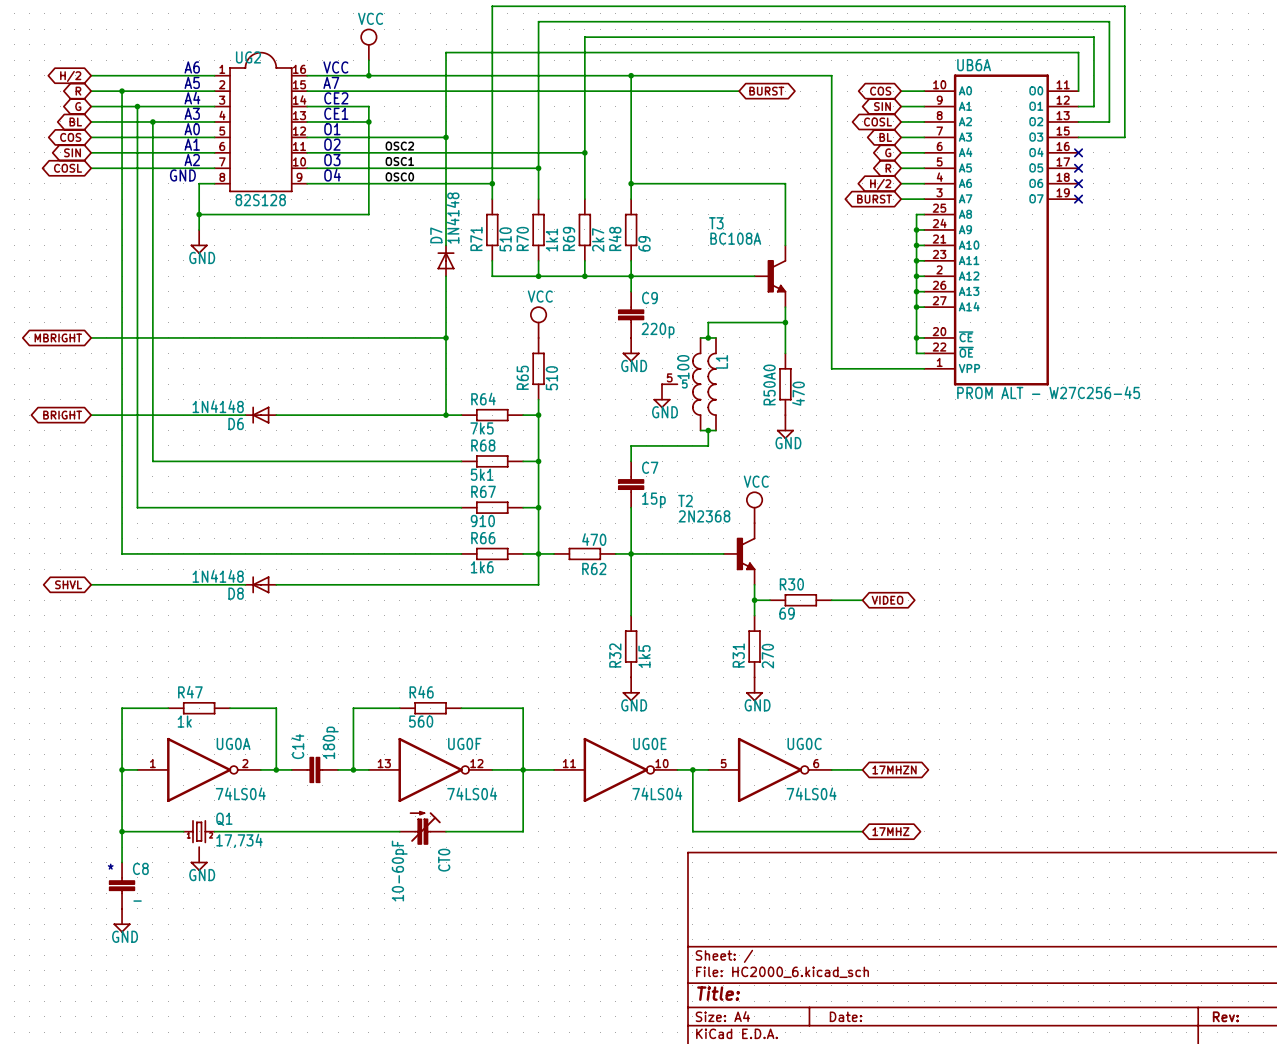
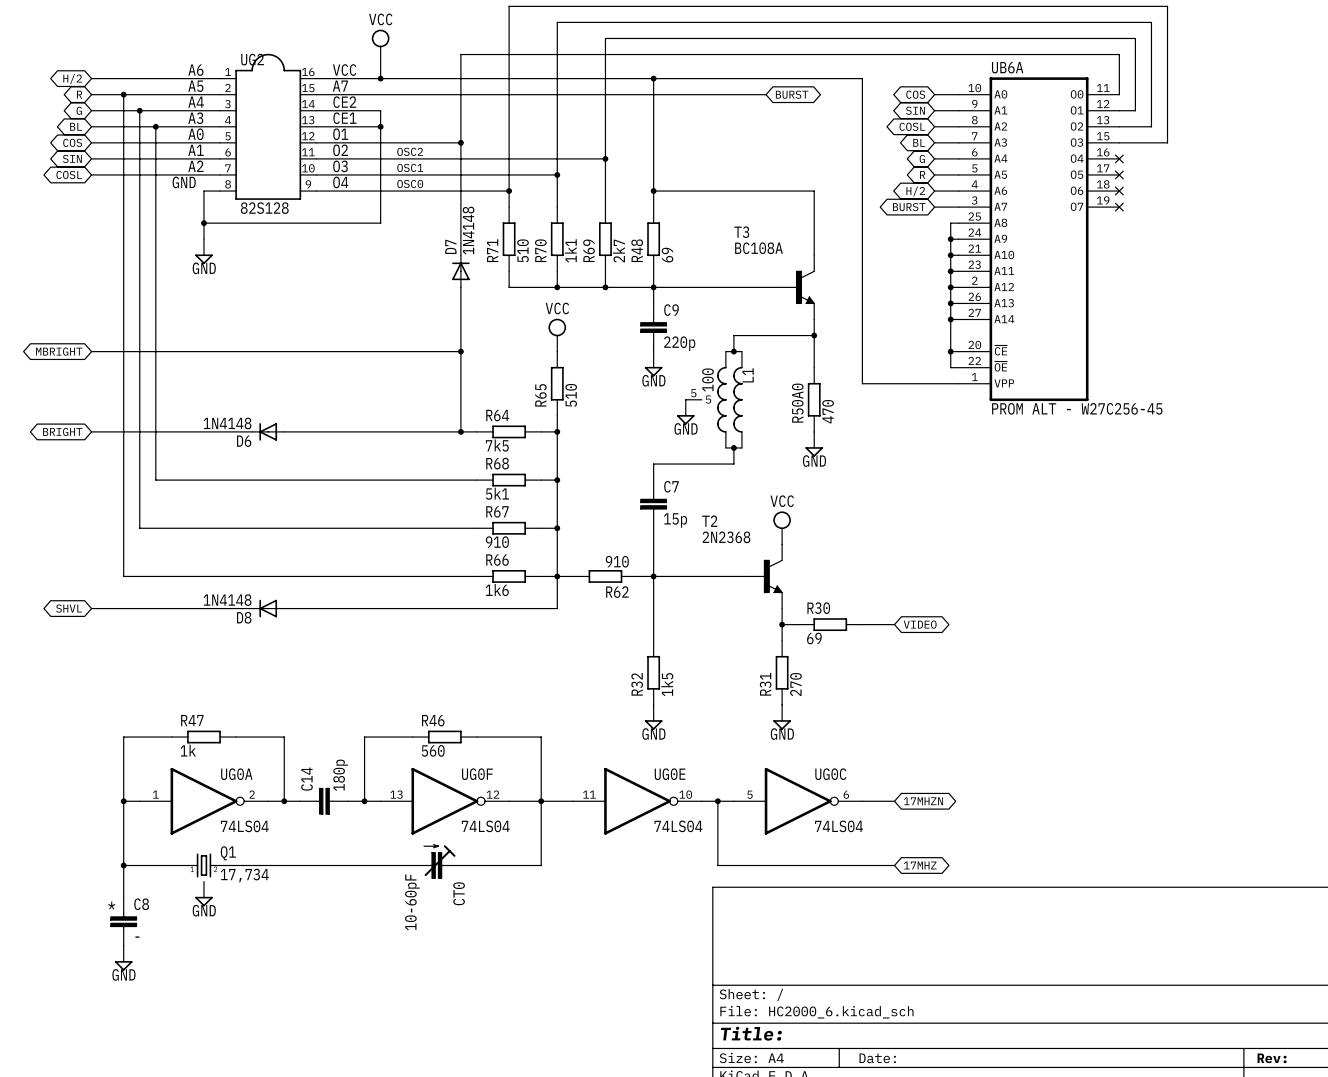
R62 value: 470 (594, 539) -> 910 (617, 561)

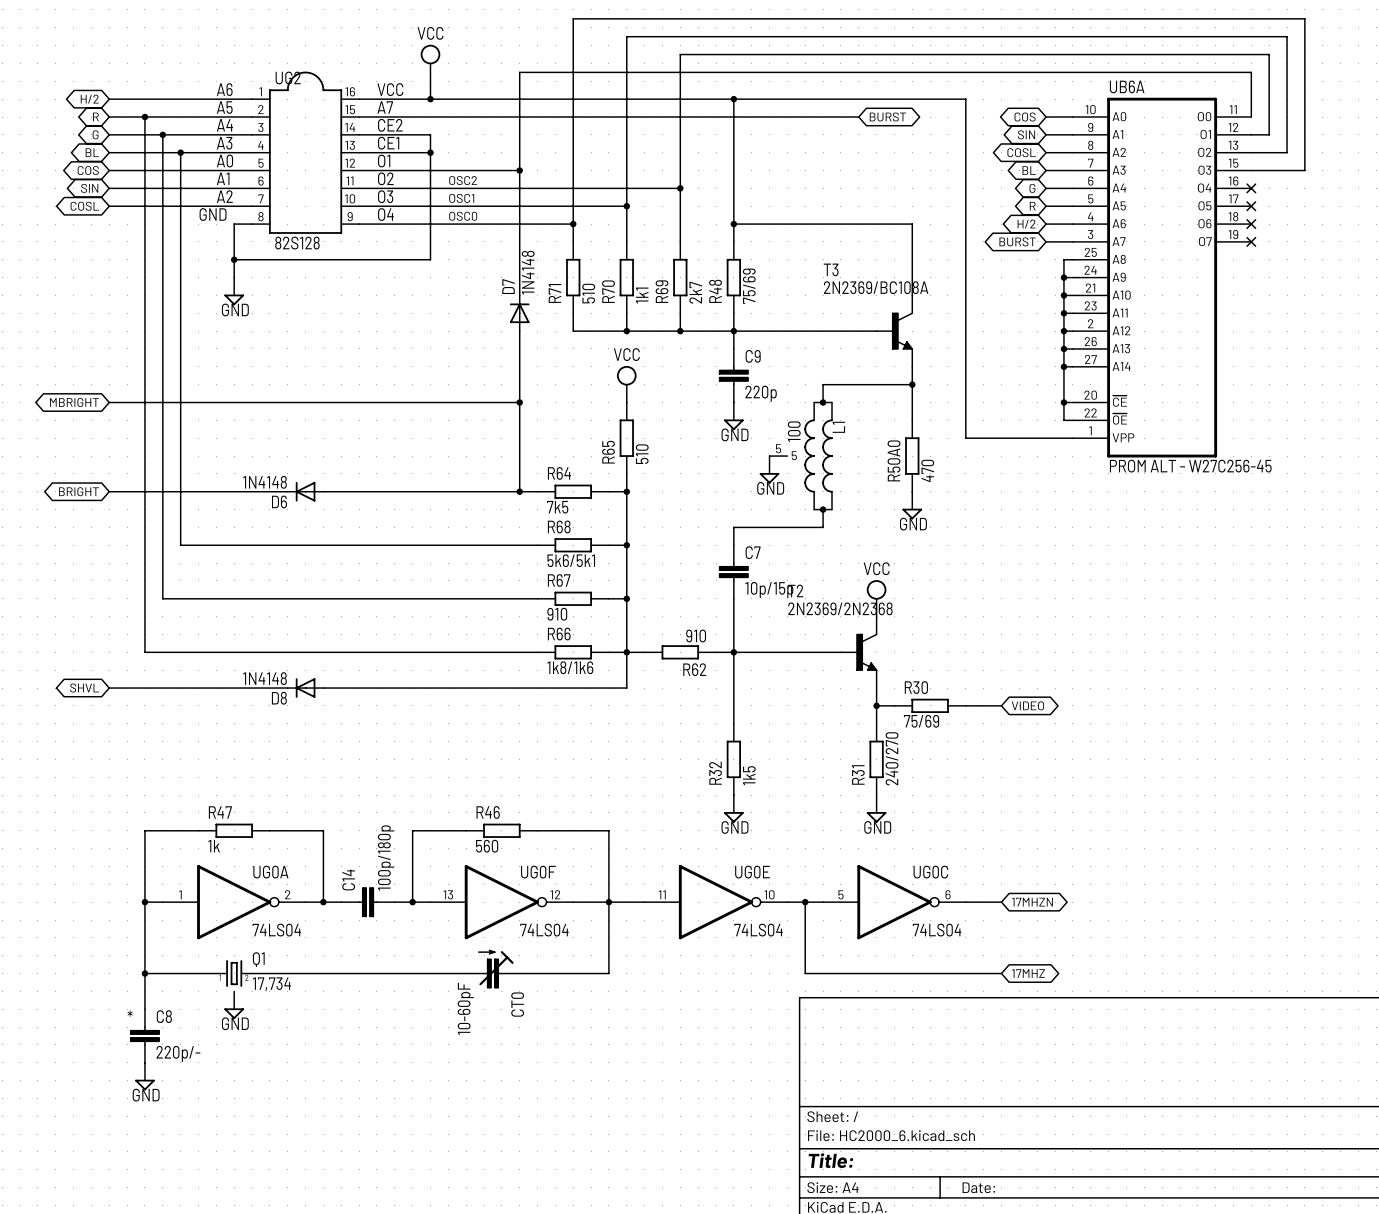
T3 value: BC108A (758, 248) -> 2N2369/BC108A (876, 287)
R48 value: 69 (667, 255) -> 75/69 (749, 286)
R68 value: 5k1 (497, 493) -> 5k6/5k1 (571, 560)
C7 value: 15p (675, 520) -> 10p/15p (769, 590)
T2 value: 2N2368 (726, 537) -> 2N2369/2N2368 (840, 608)
R66 value: 1k6 (497, 590) -> 1k8/1k6 (570, 667)
R30 value: 69 (814, 638) -> 75/69 (921, 721)
R31 value: 270 (795, 684) -> 240/270 (892, 758)
C14 value: 180p (340, 775) -> 100p/180p (385, 857)
C8 value: - (137, 937) -> 220p/- (178, 1053)

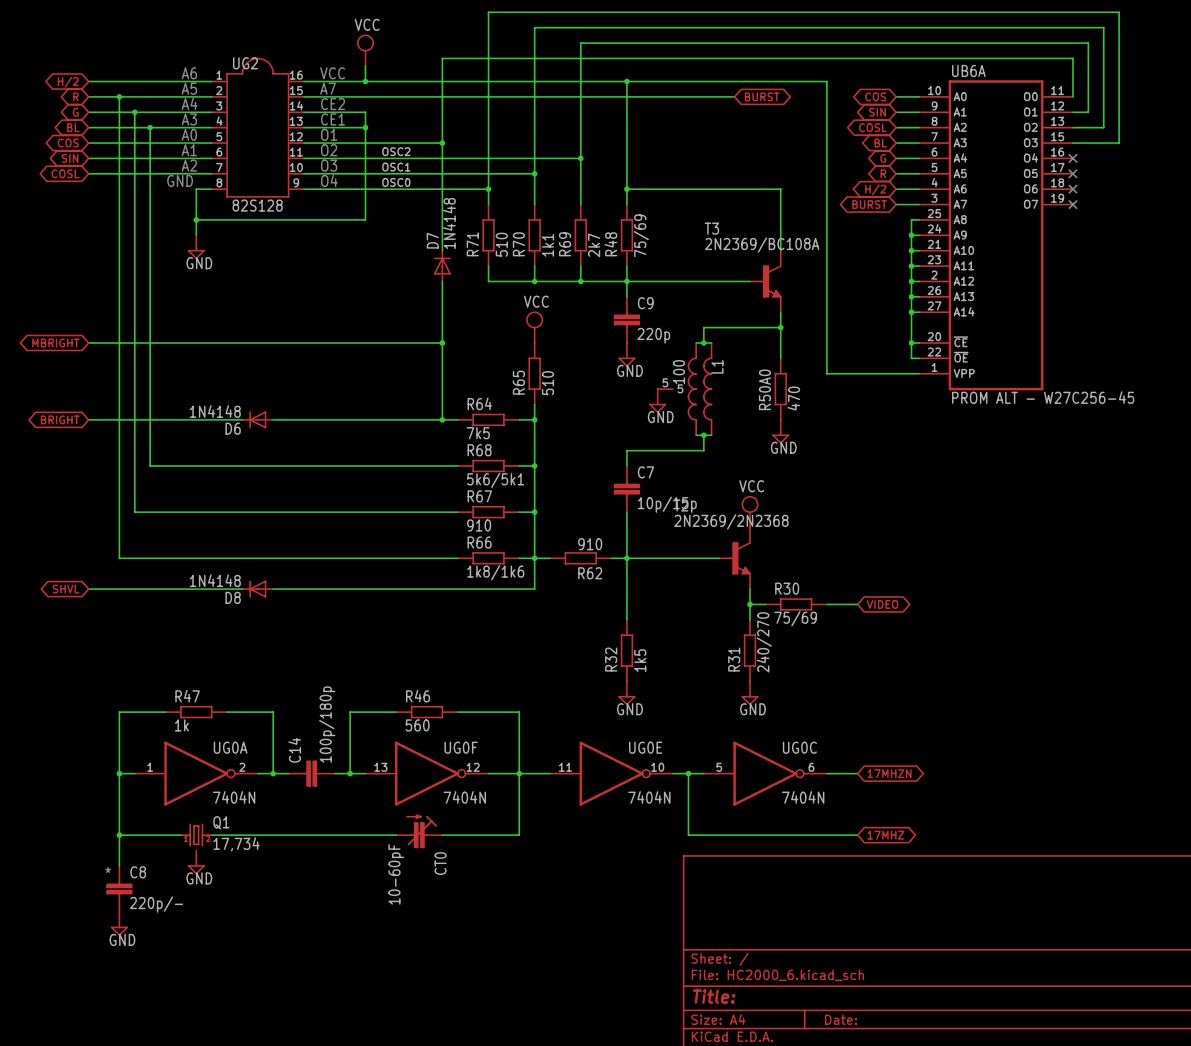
UG0A value: 74LS04 (276, 930) -> 7404N (234, 797)
UG0F value: 74LS04 (544, 930) -> 7404N (464, 797)
UG0E value: 74LS04 (758, 930) -> 7404N (649, 797)
UG0C value: 74LS04 (937, 930) -> 7404N (803, 797)

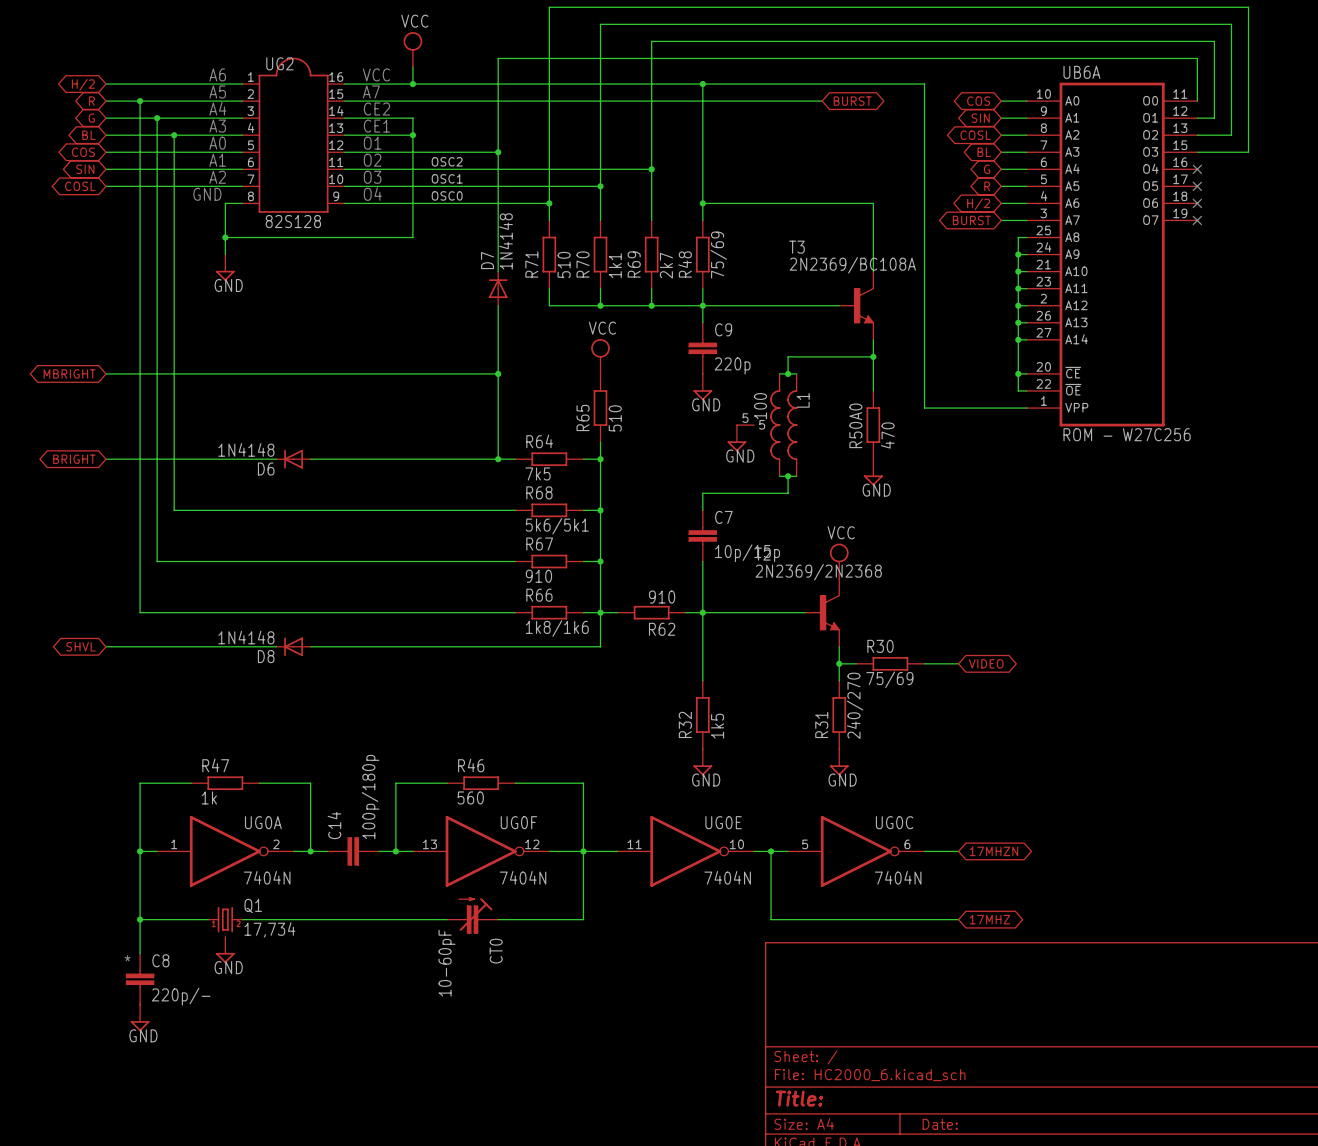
UB6A value: PROM ALT - W27C256-45 (1043, 397) -> ROM - W27C256 (1127, 434)

